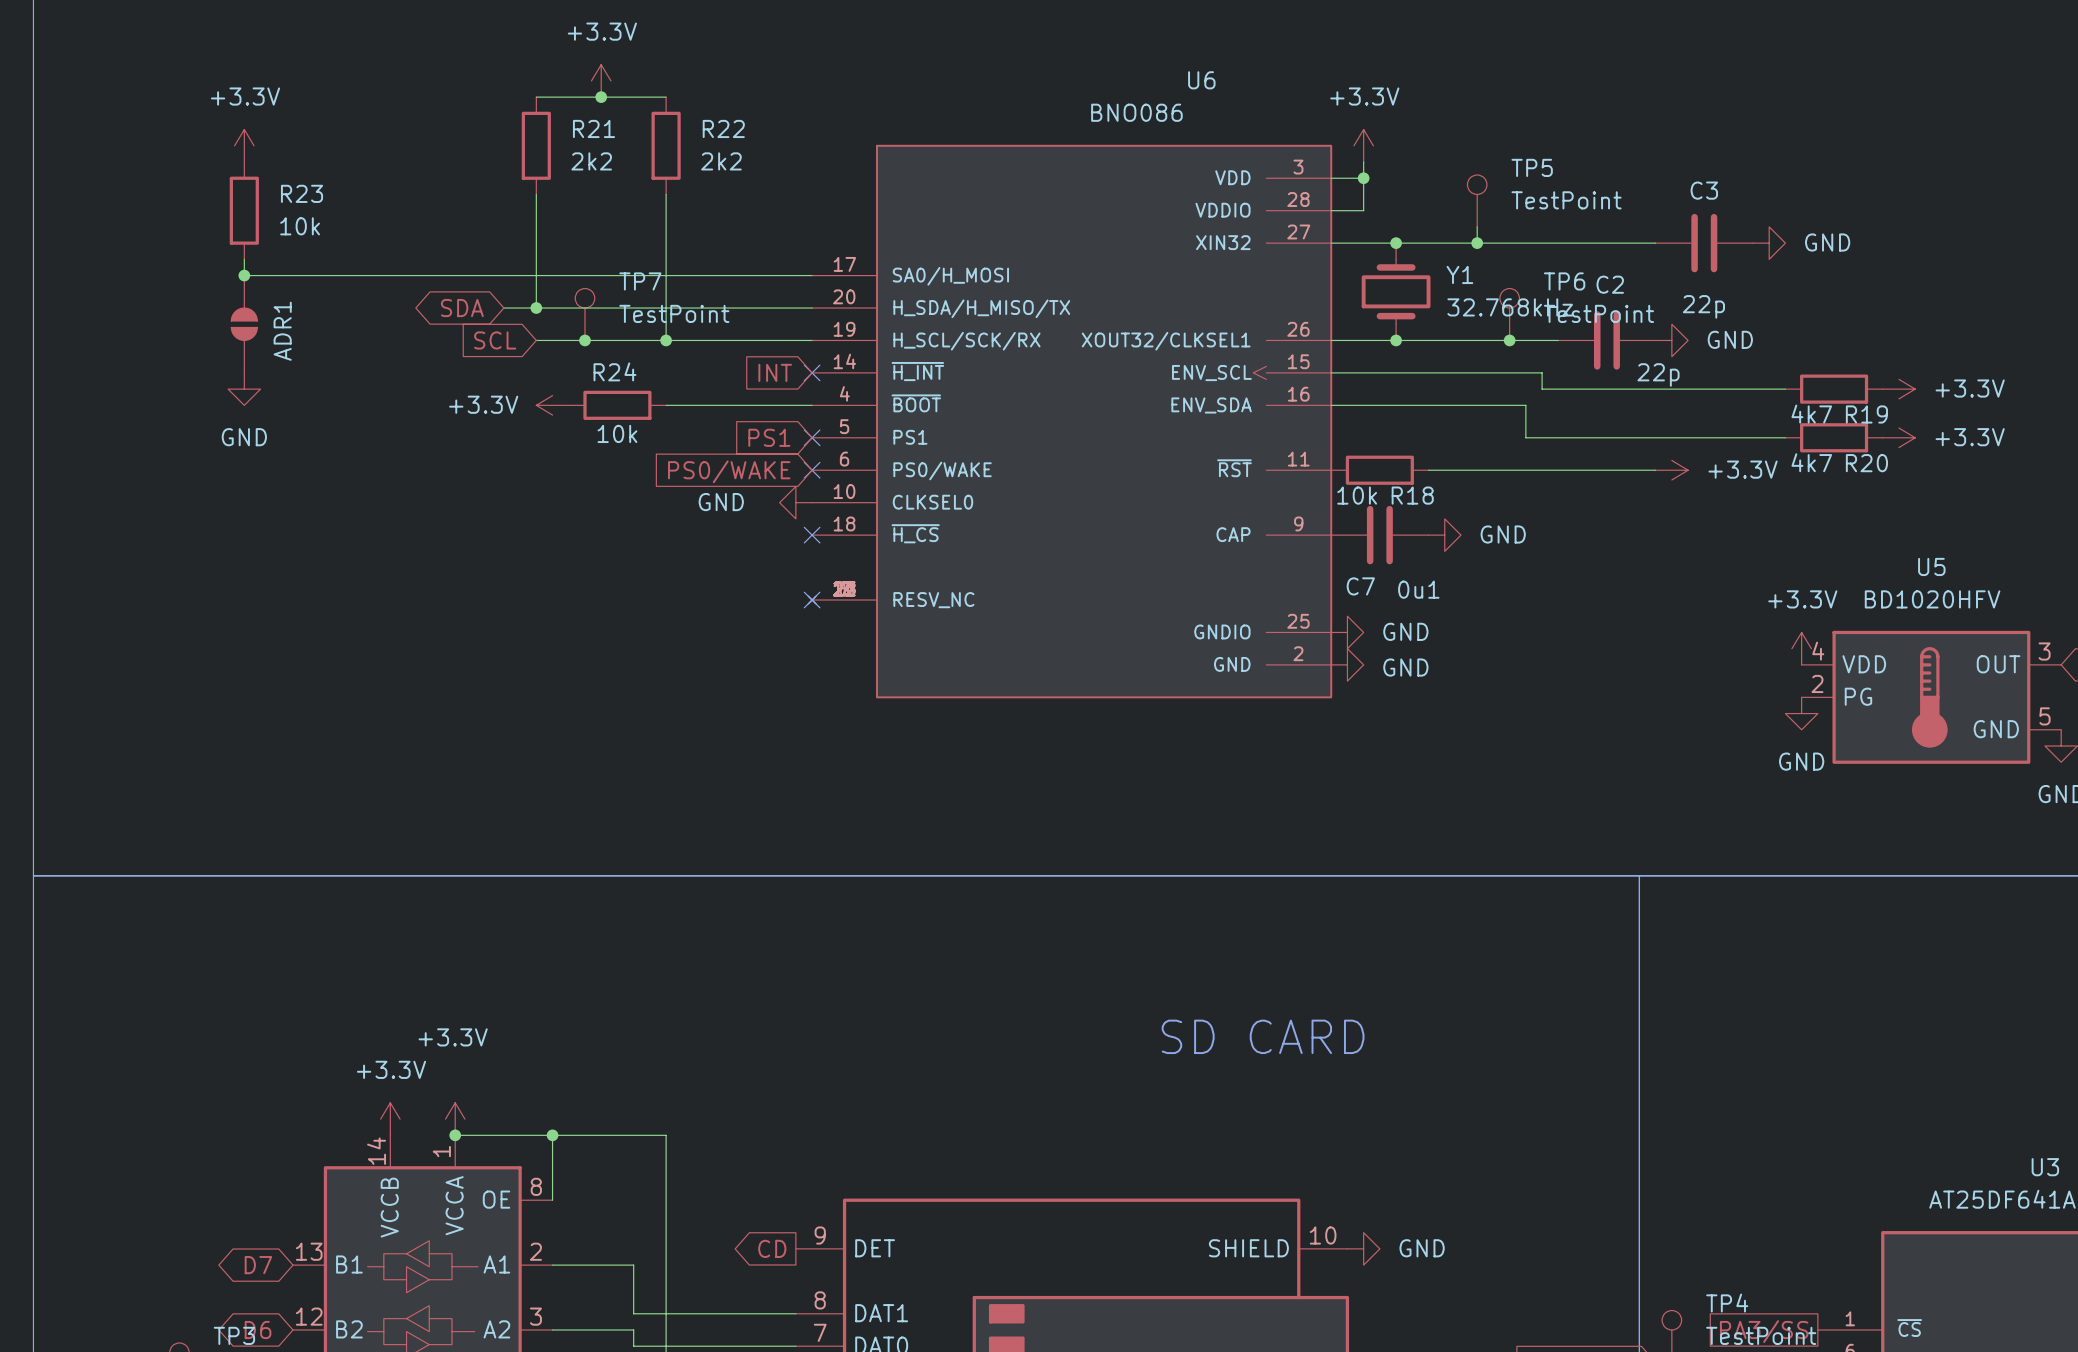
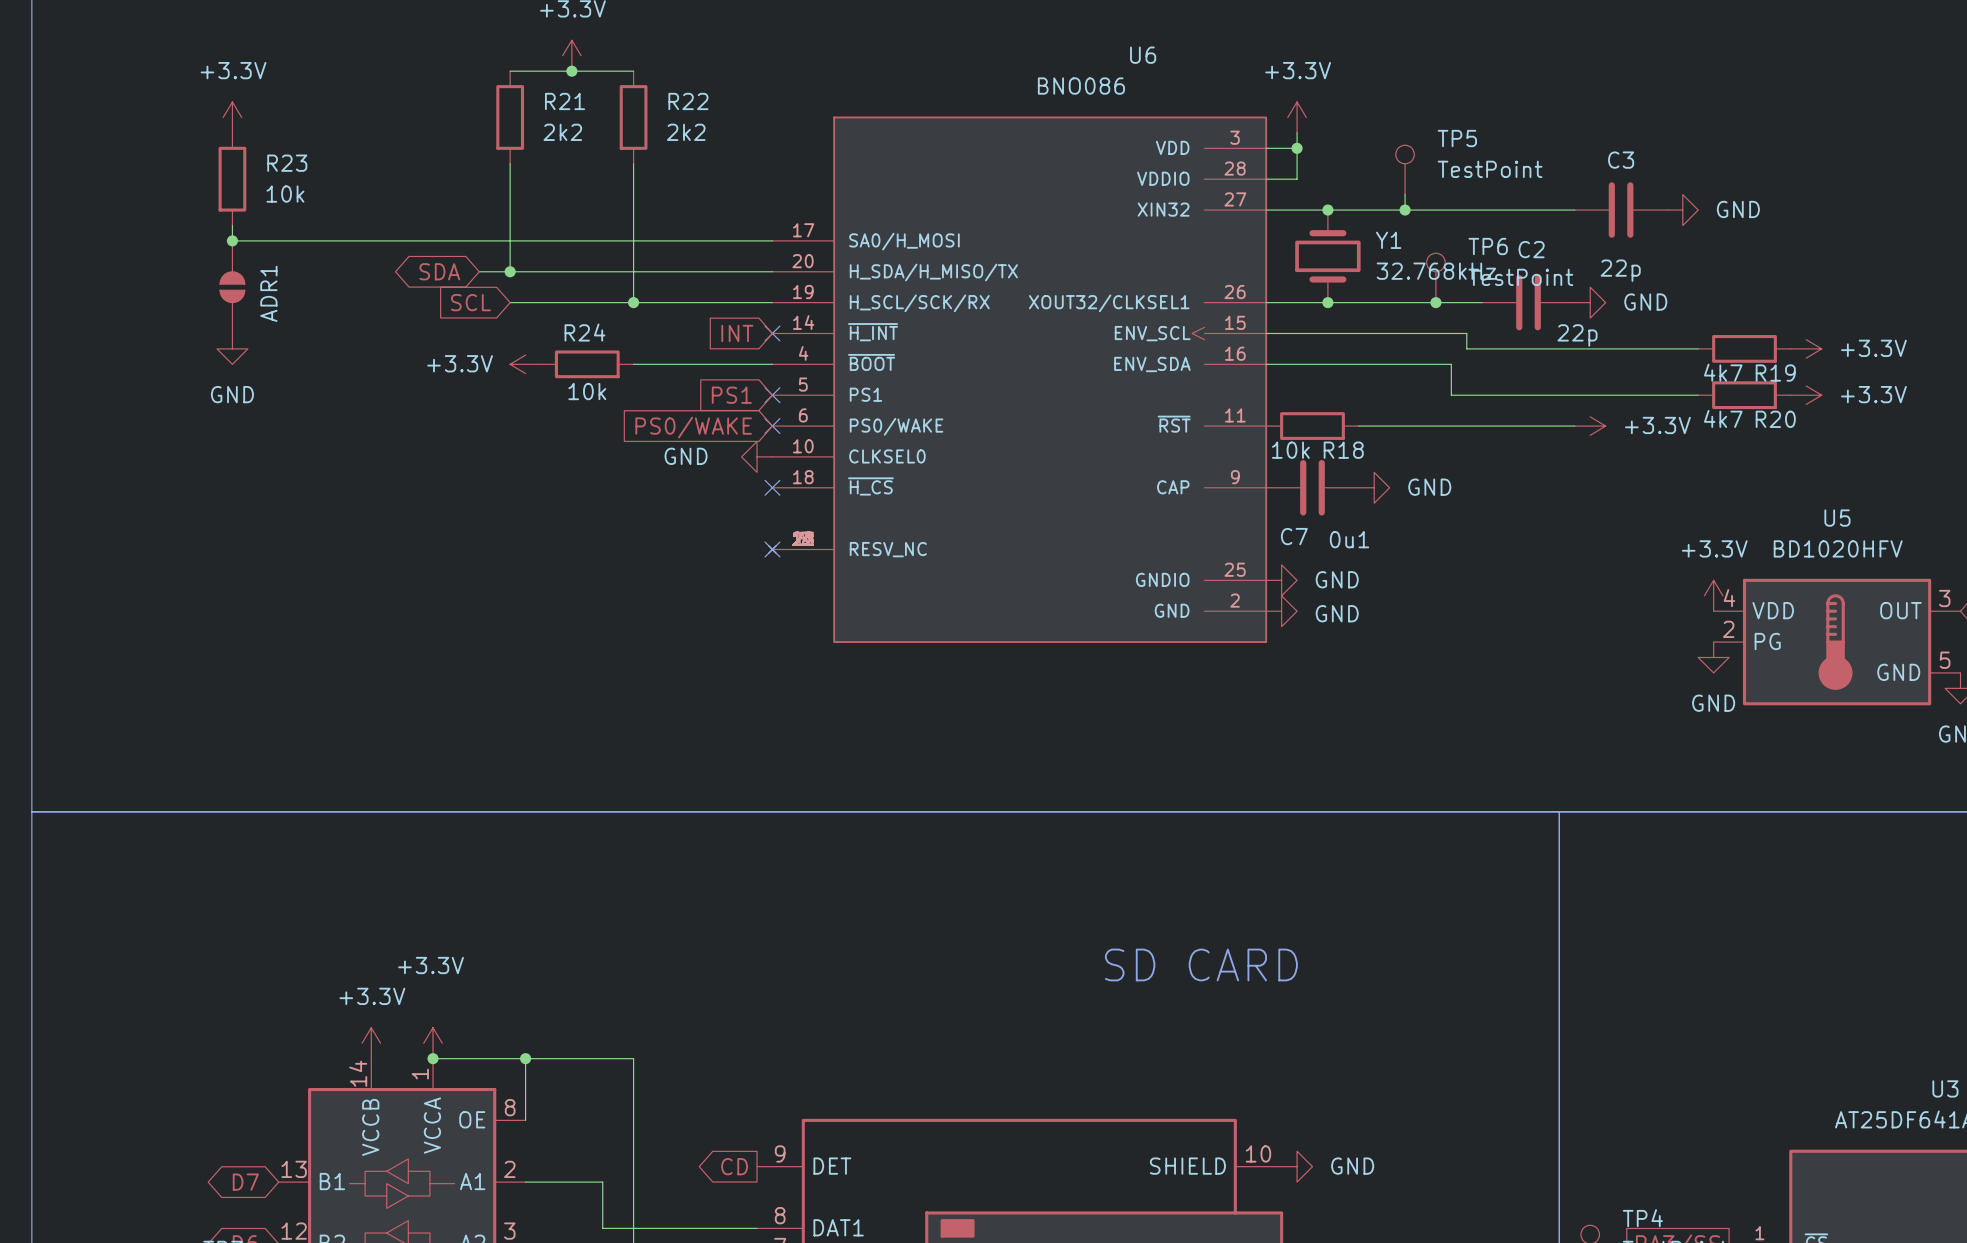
TP7: TestPoint (584, 314) -> none
junction: (584, 340) -> none

